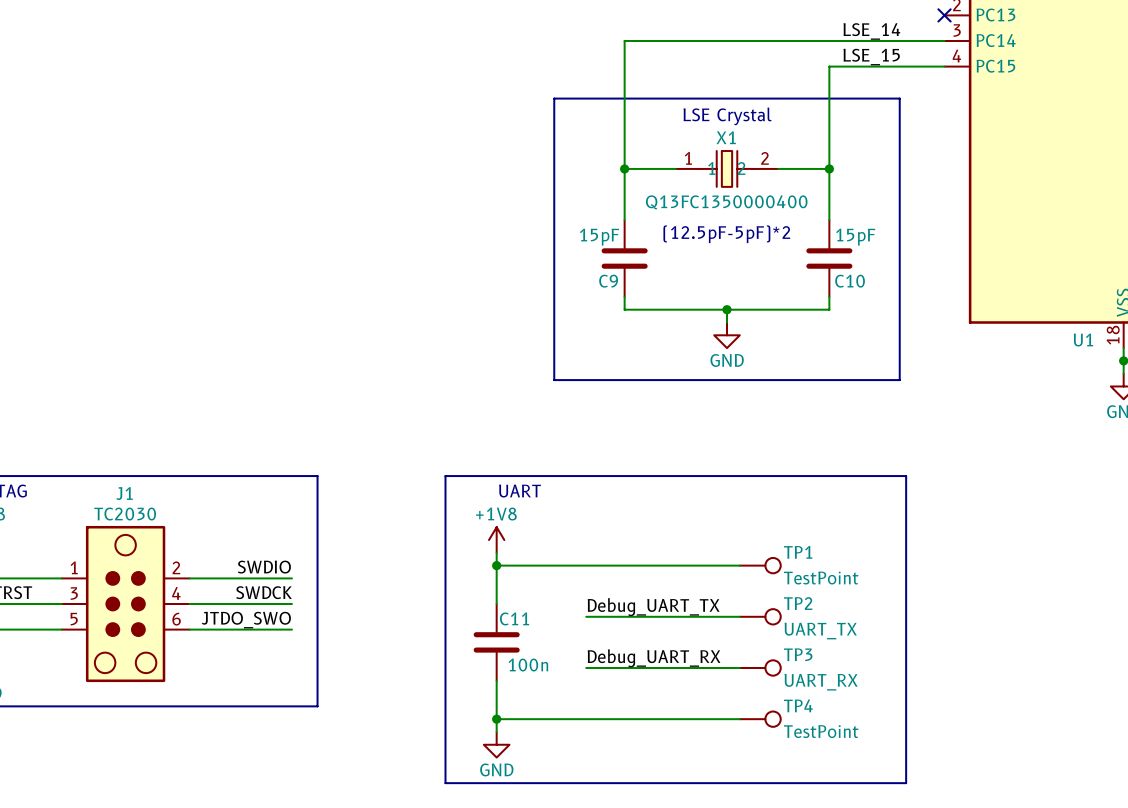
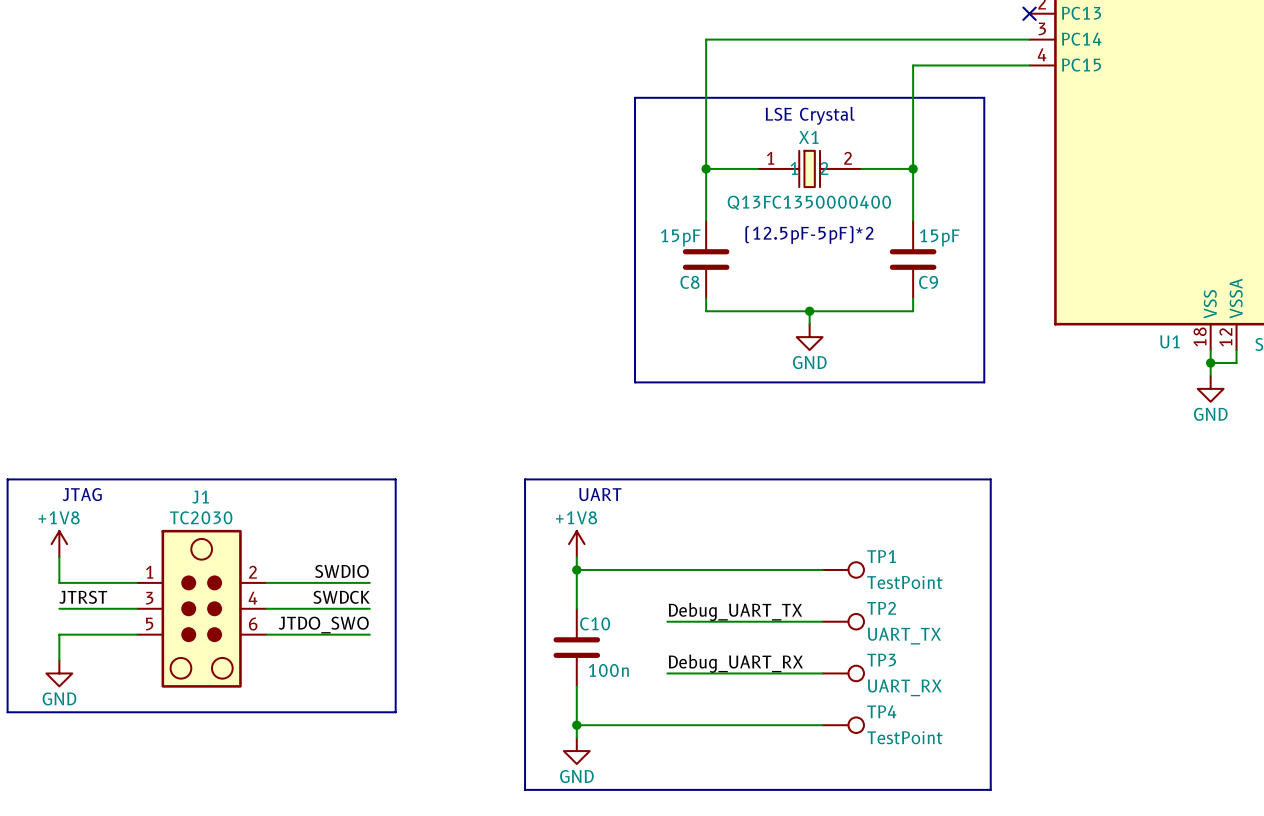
label: LSE_14 (871, 31) -> none
label: LSE_15 (871, 57) -> none
C9 name: C9 (608, 281) -> C8 (690, 282)
C10 name: C10 (850, 281) -> C9 (928, 282)
C11 name: C11 (514, 618) -> C10 (595, 623)

